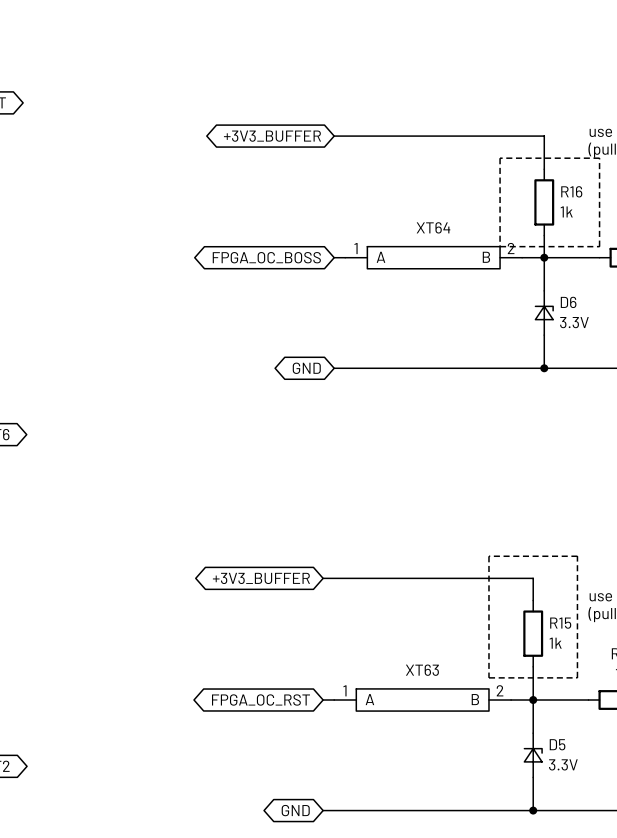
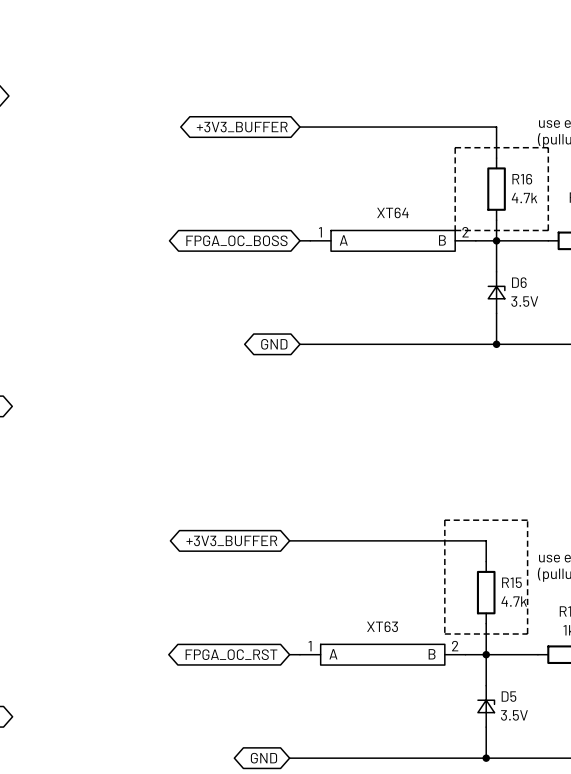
R16 value: 1k (566, 211) -> 4.7k (524, 198)
D6 value: 3.3V (574, 322) -> 3.5V (524, 301)
R15 value: 1k (555, 643) -> 4.7k (514, 601)
D5 value: 3.3V (563, 764) -> 3.5V (514, 715)

